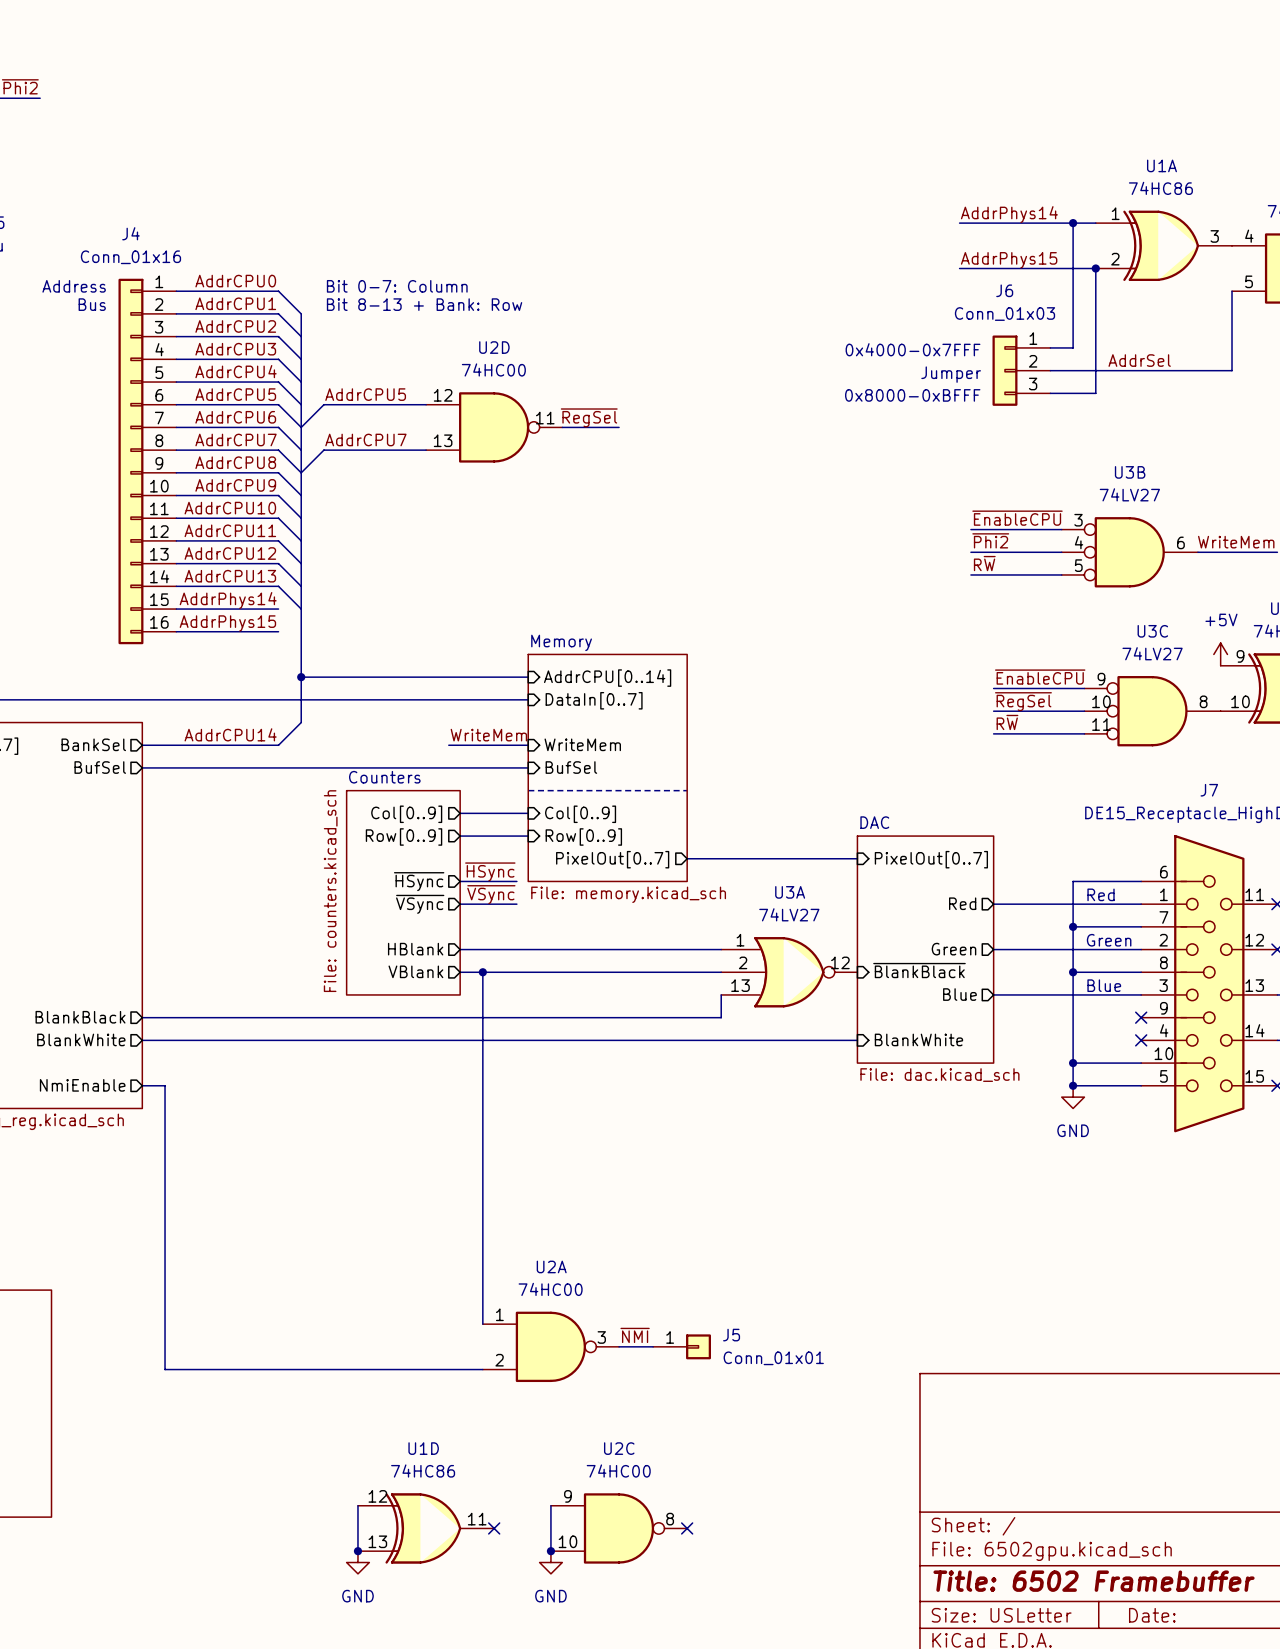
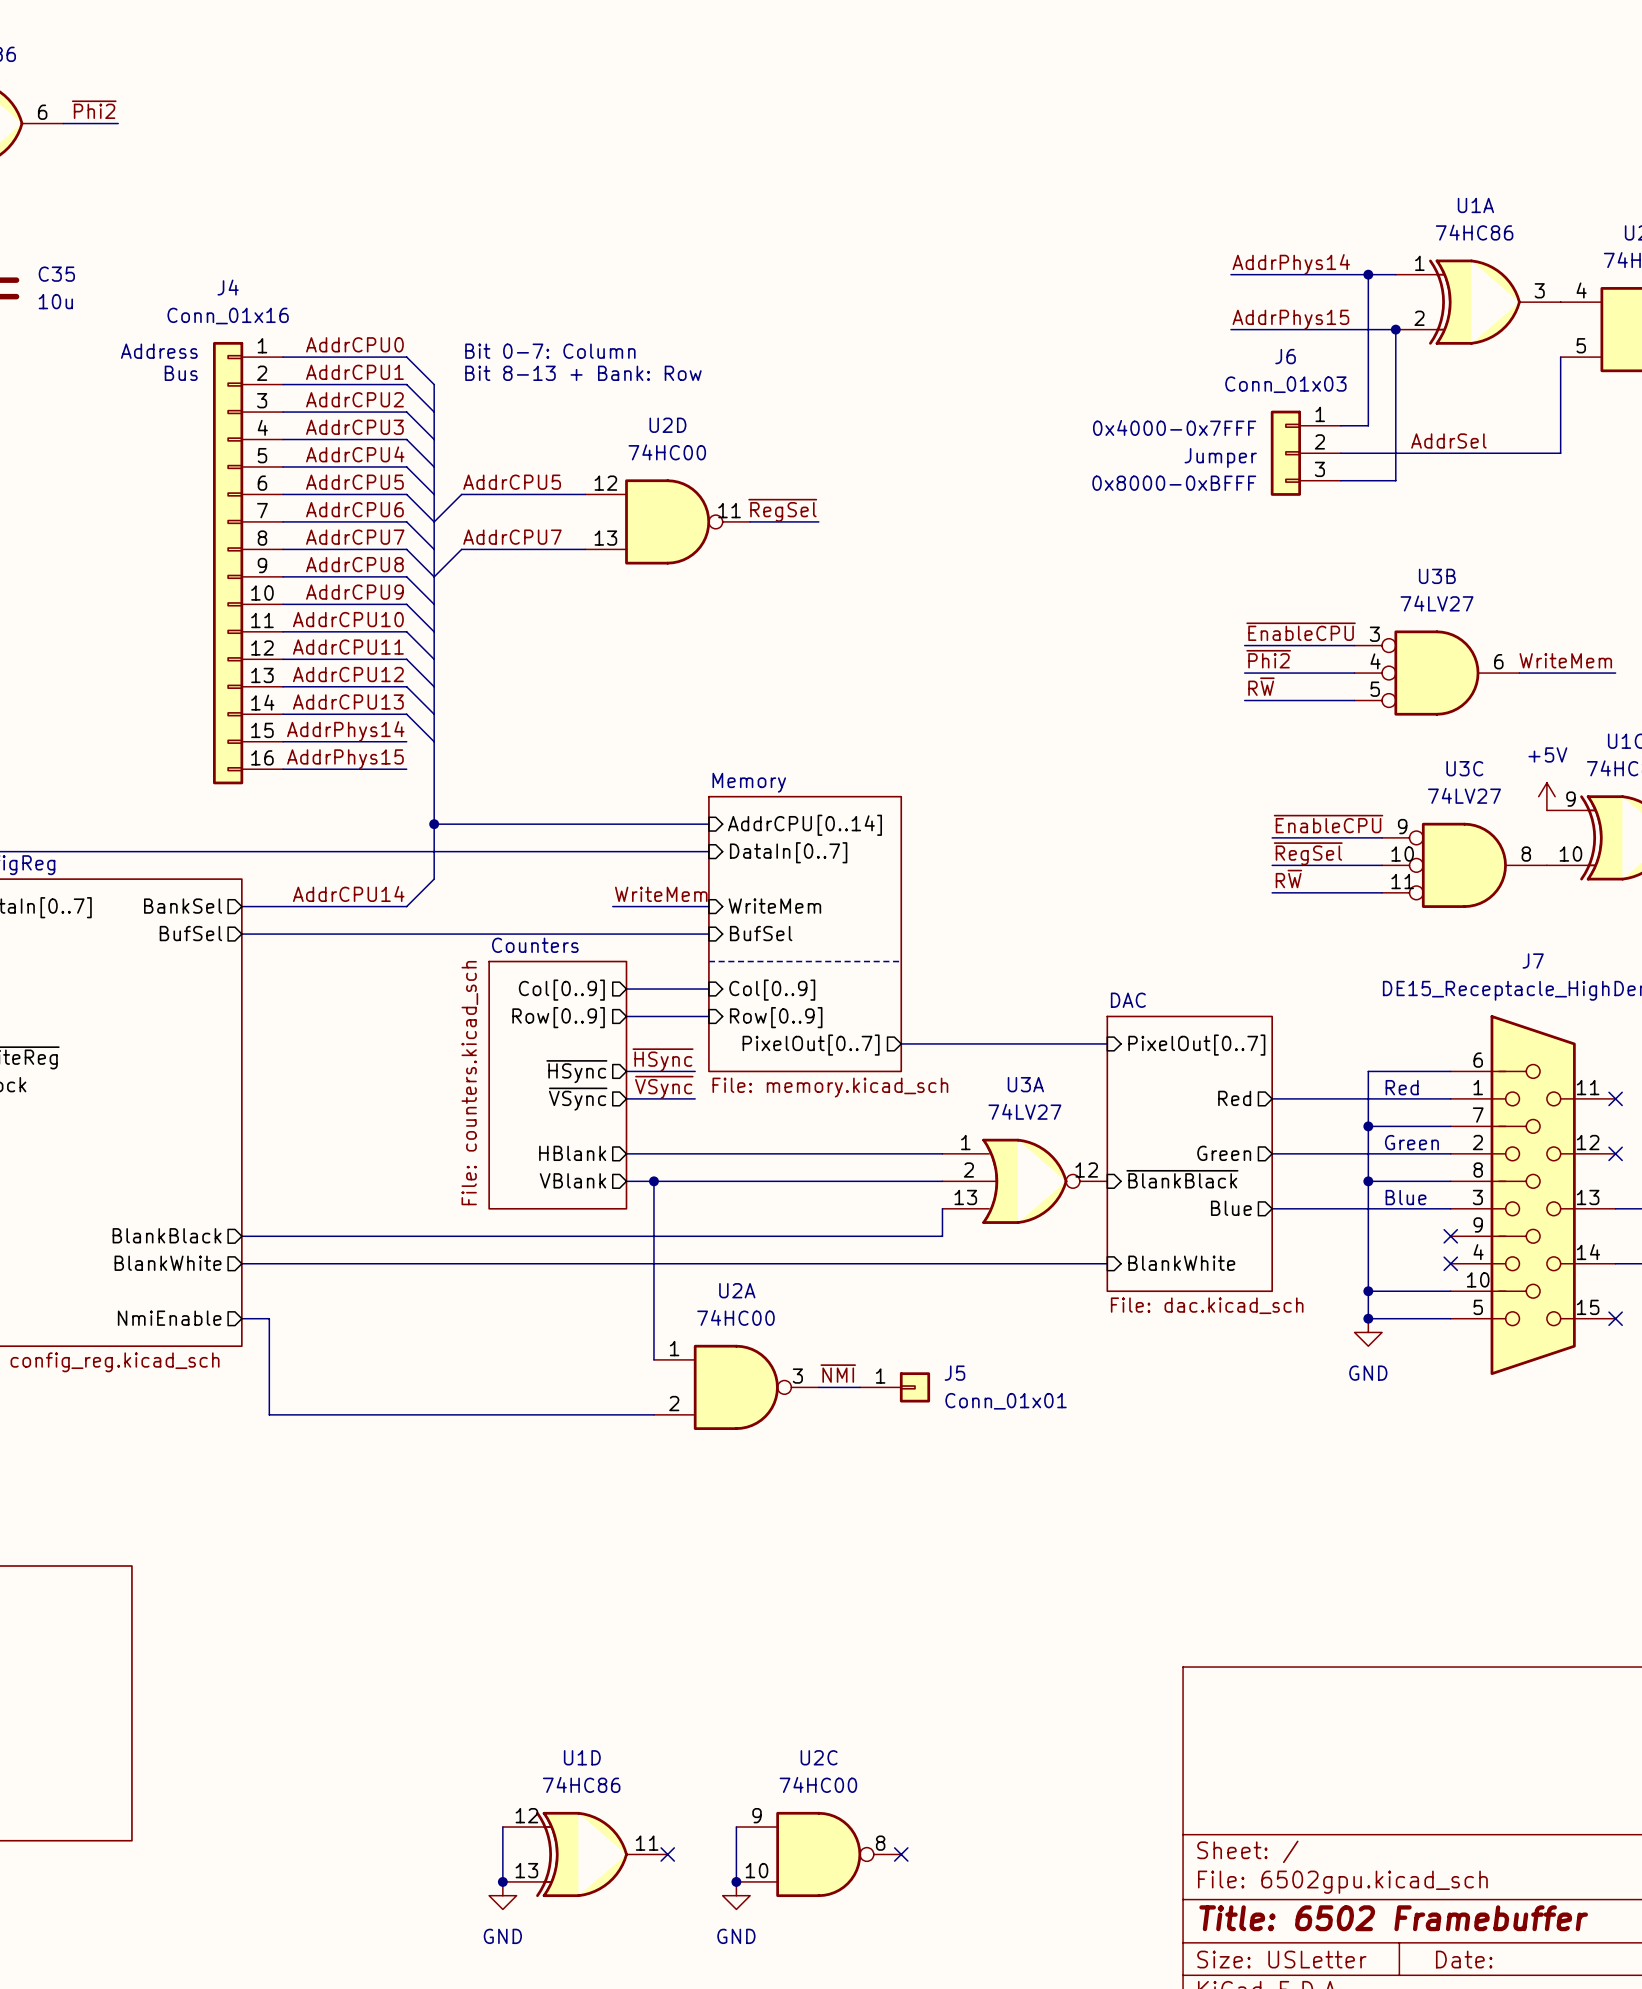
wire: (482, 1119) (482, 1324) -> none
wire: (165, 1165) (165, 1369) (482, 1369) -> (269, 1414) (653, 1414)
label position: ~{NMI} (635, 1335) -> ~{NMI} (838, 1373)
U2A position: (550, 1346) -> (736, 1387)
wire: (619, 1346) (653, 1346) -> (818, 1387) (860, 1387)
J5 position: (682, 1346) -> (895, 1387)

